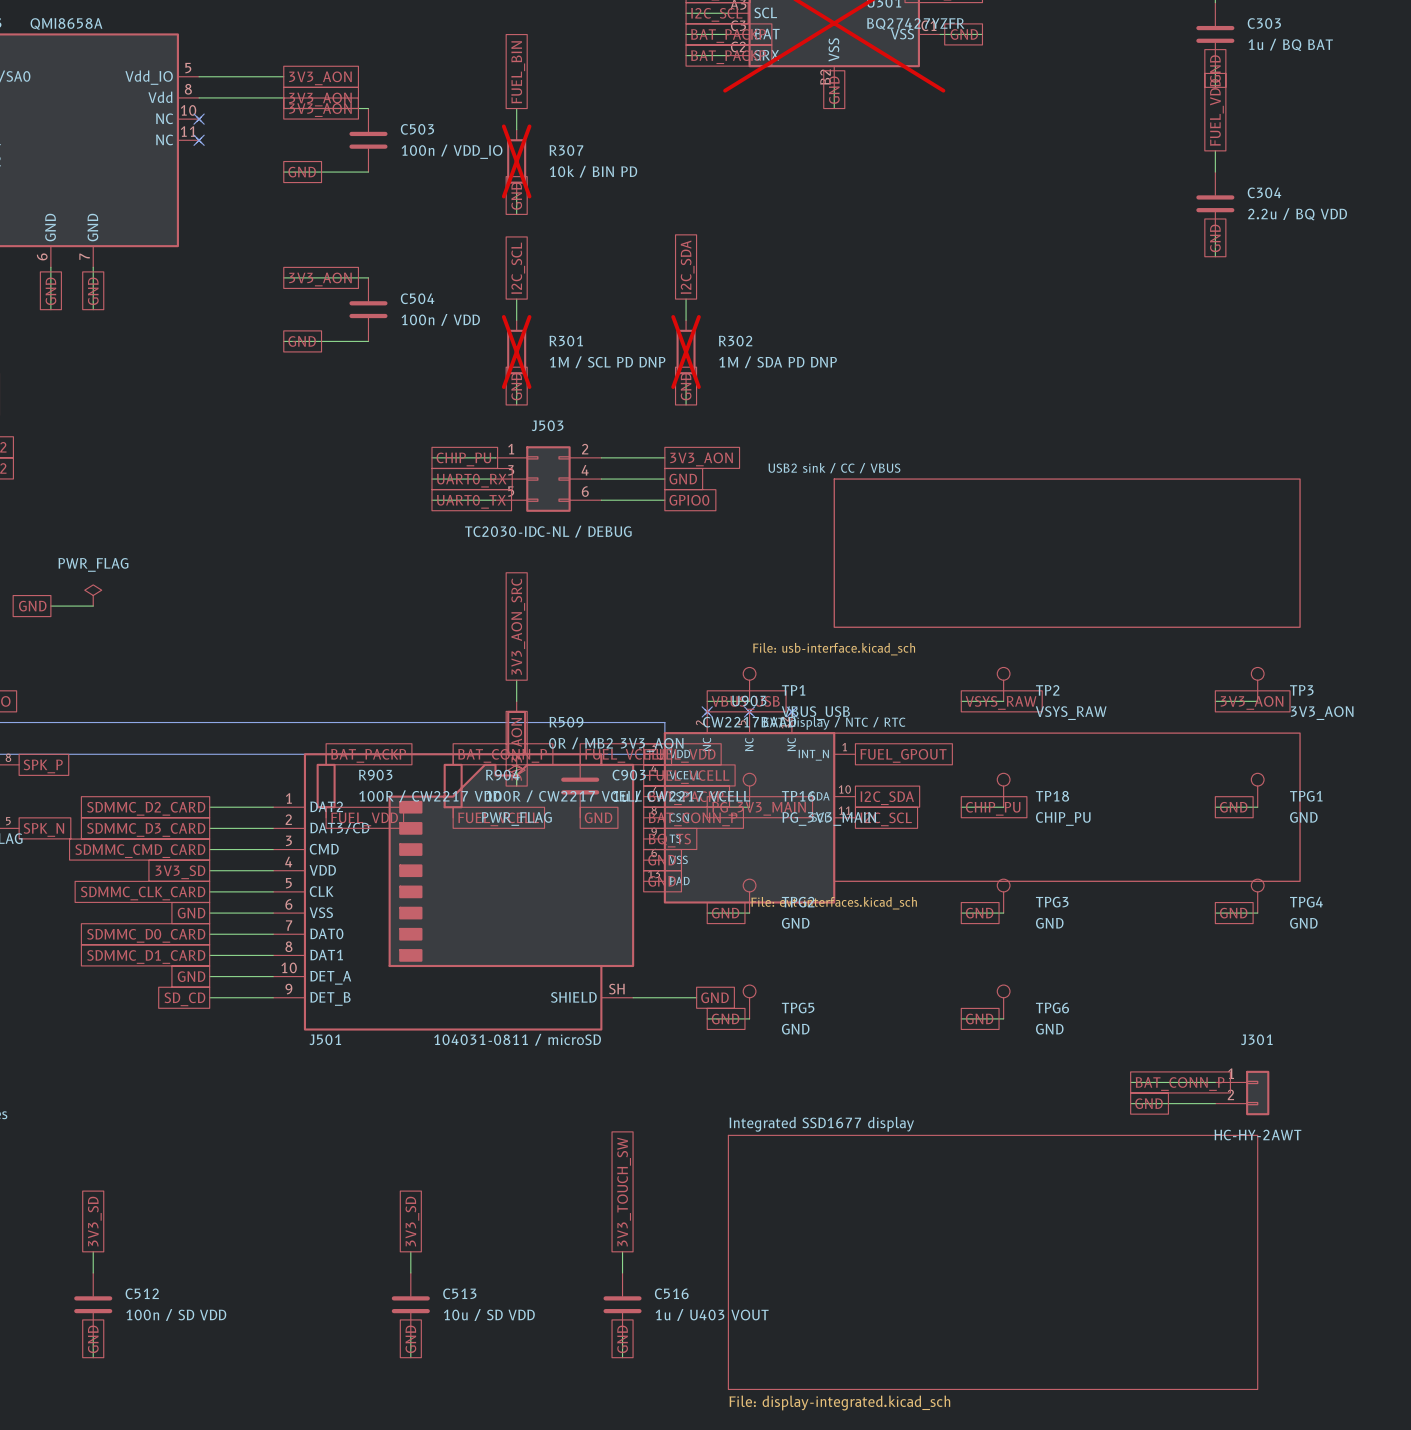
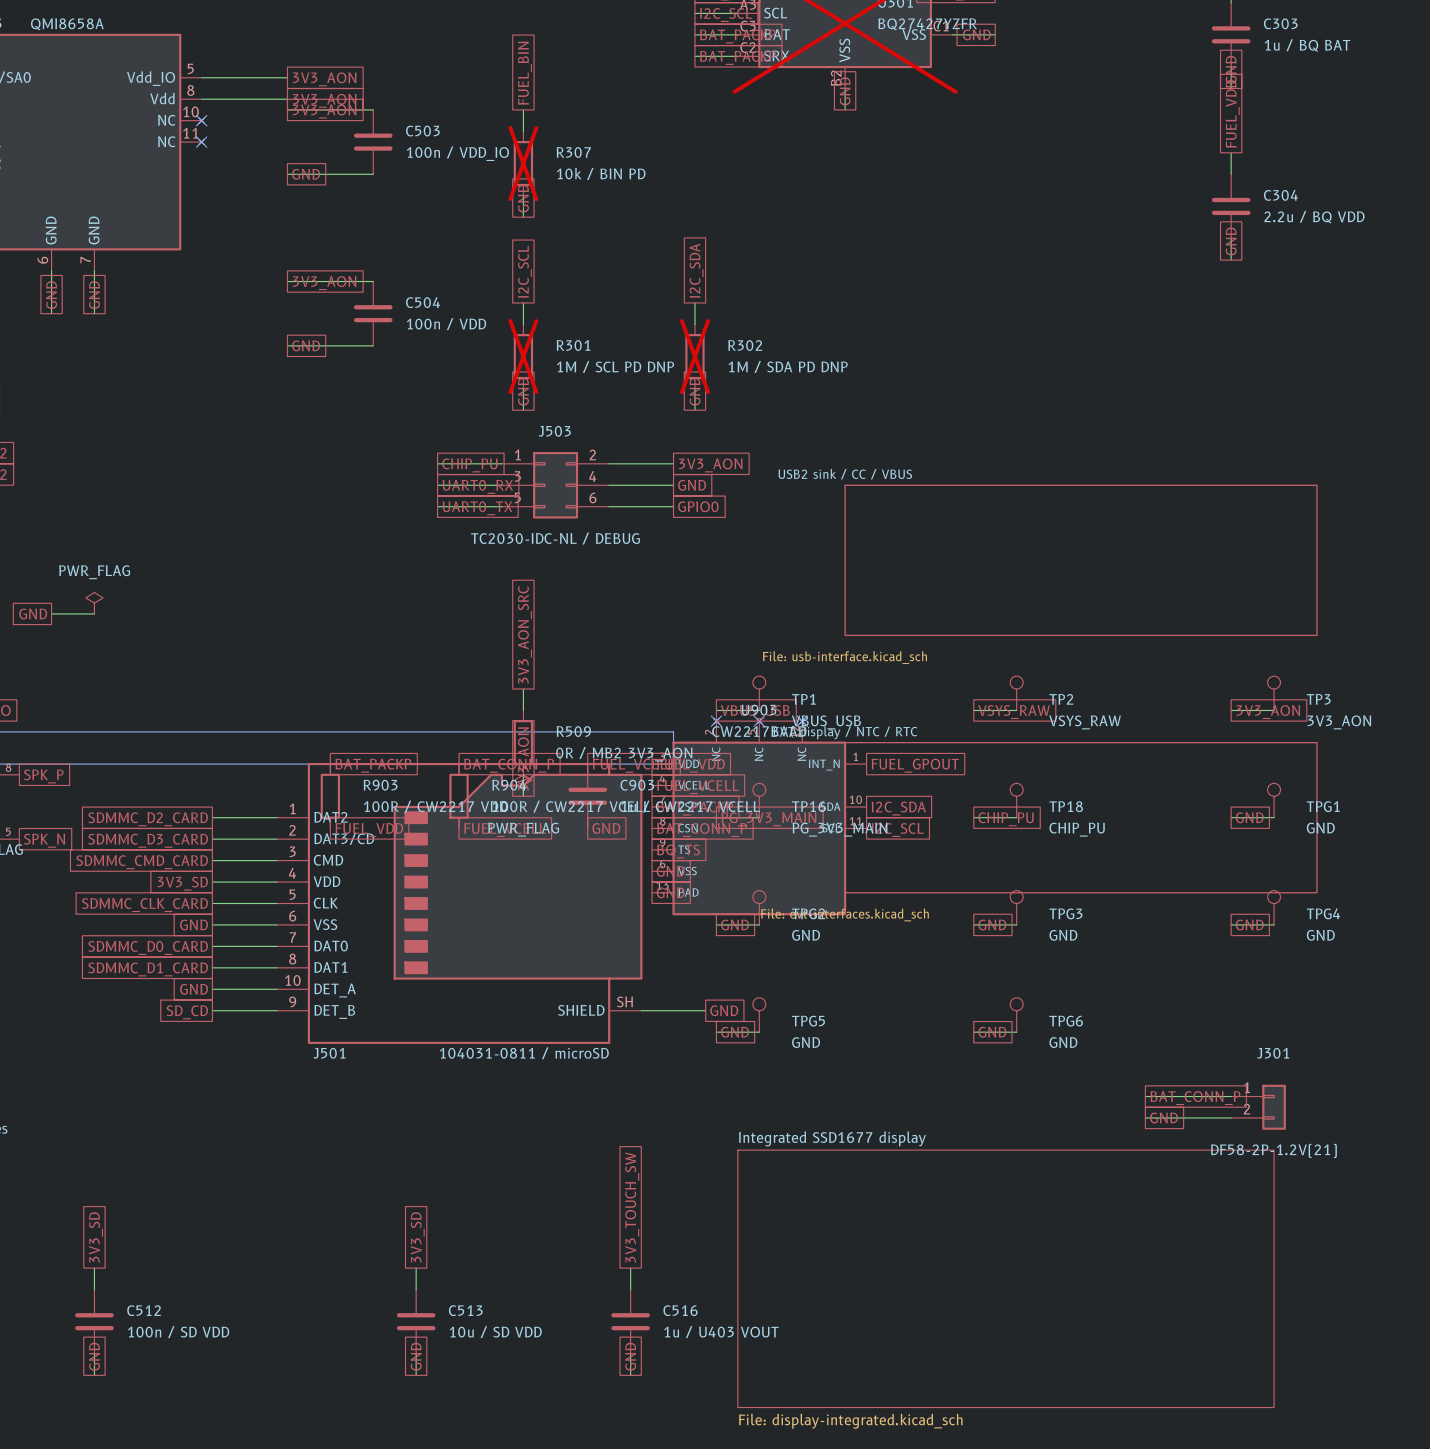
J301 value: HC-HY-2AWT (1257, 1135) -> DF58-2P-1.2V(21) (1273, 1150)

